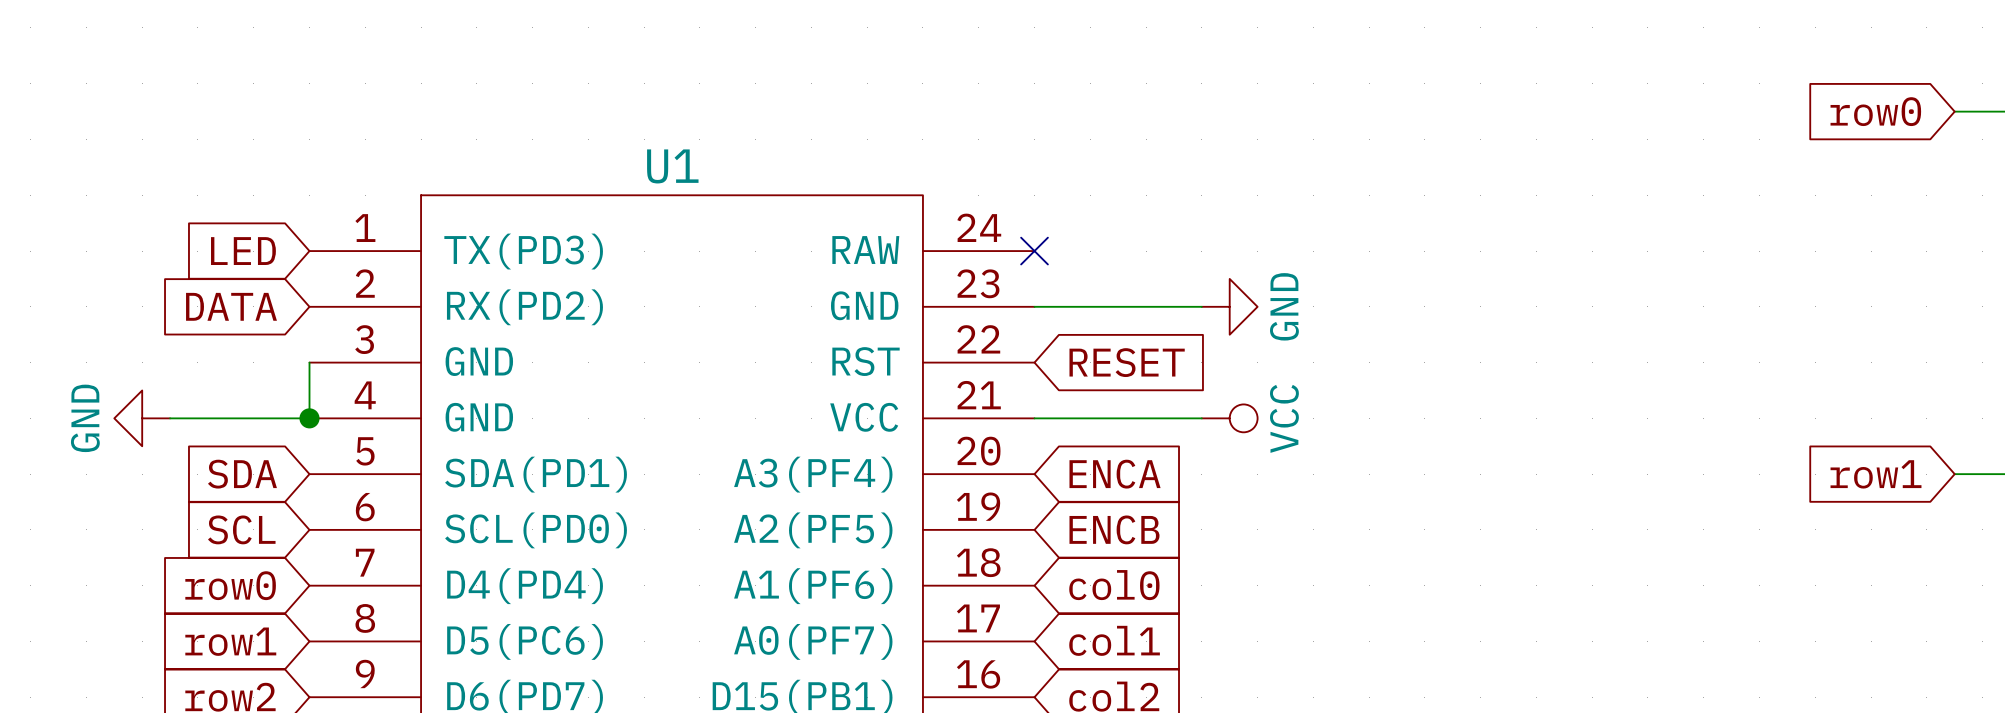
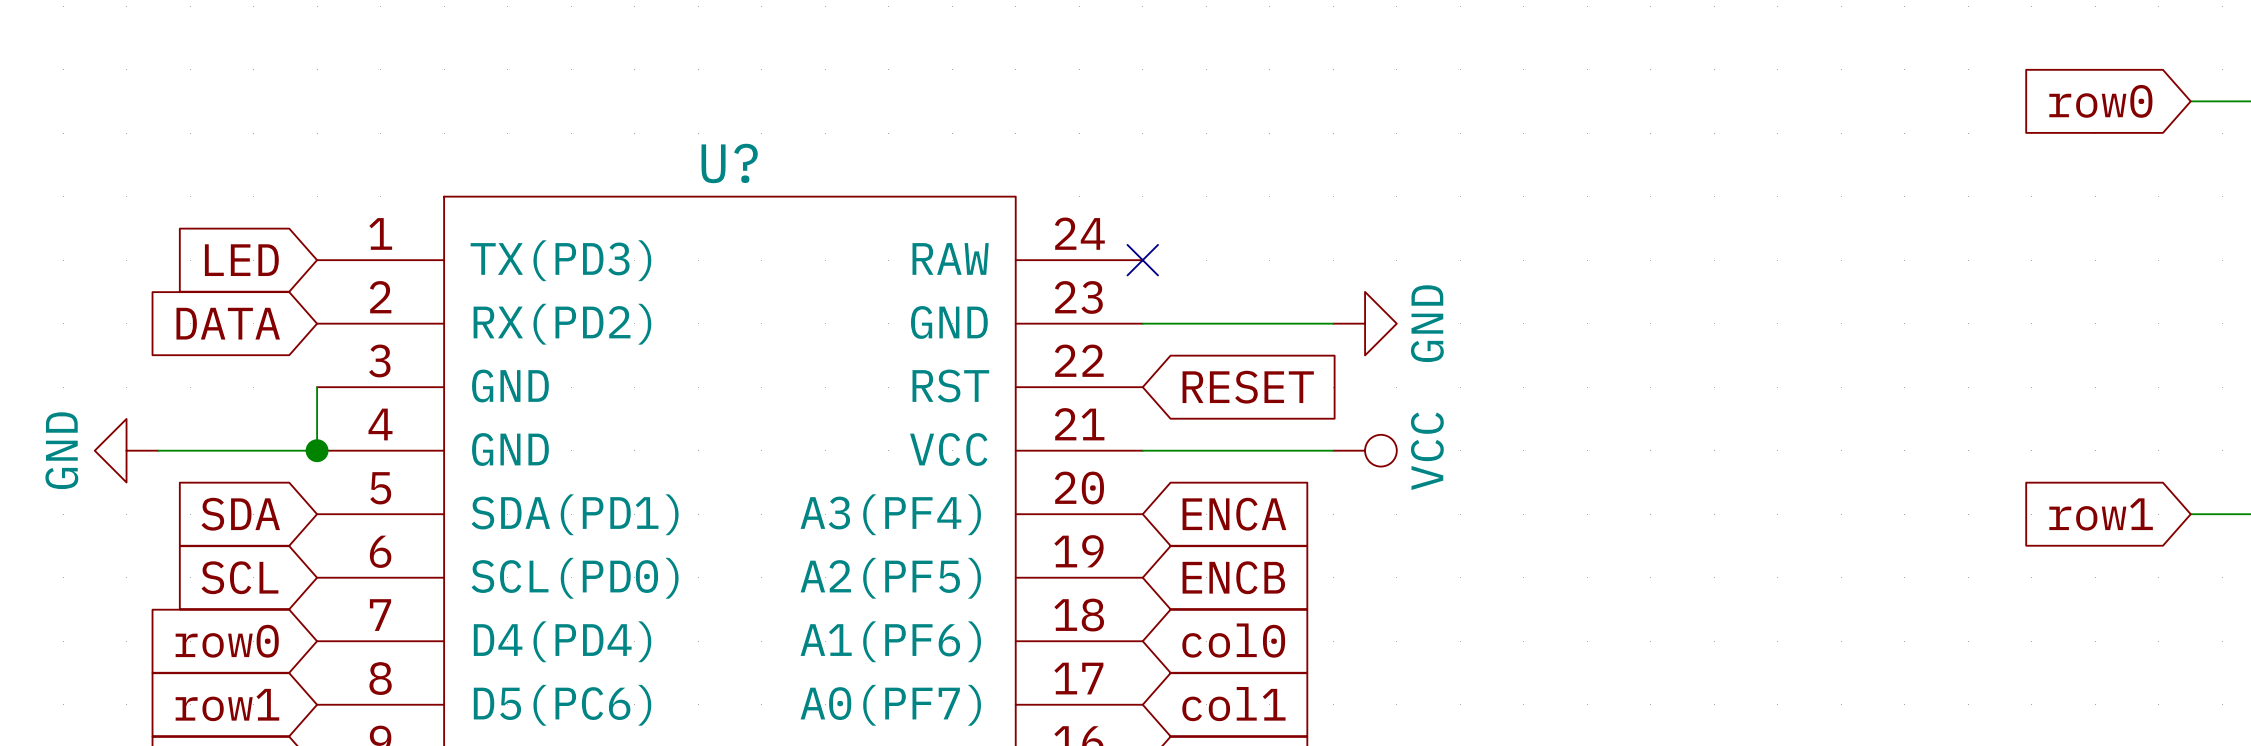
U1 name: U1 (672, 166) -> U? (729, 163)

